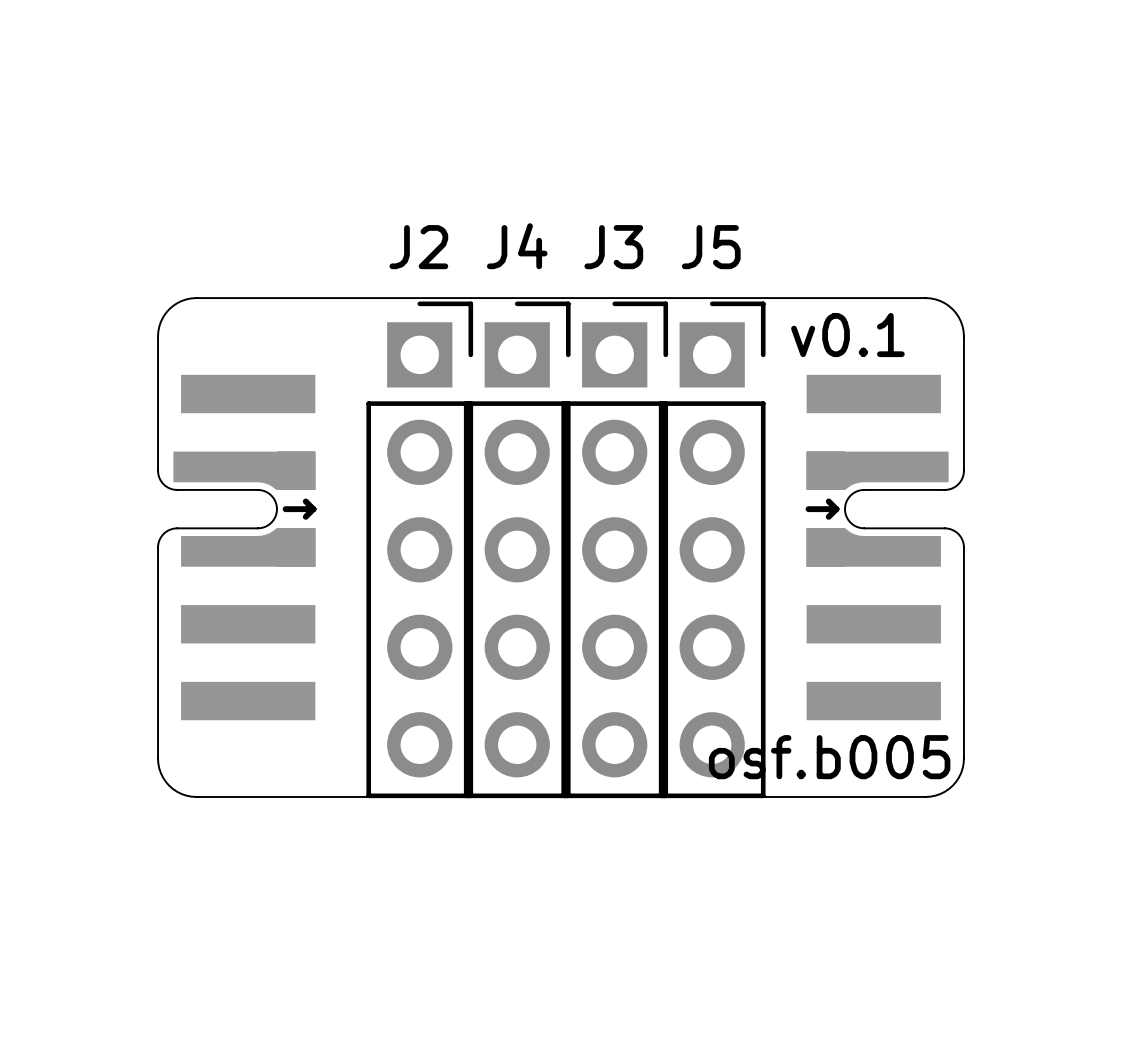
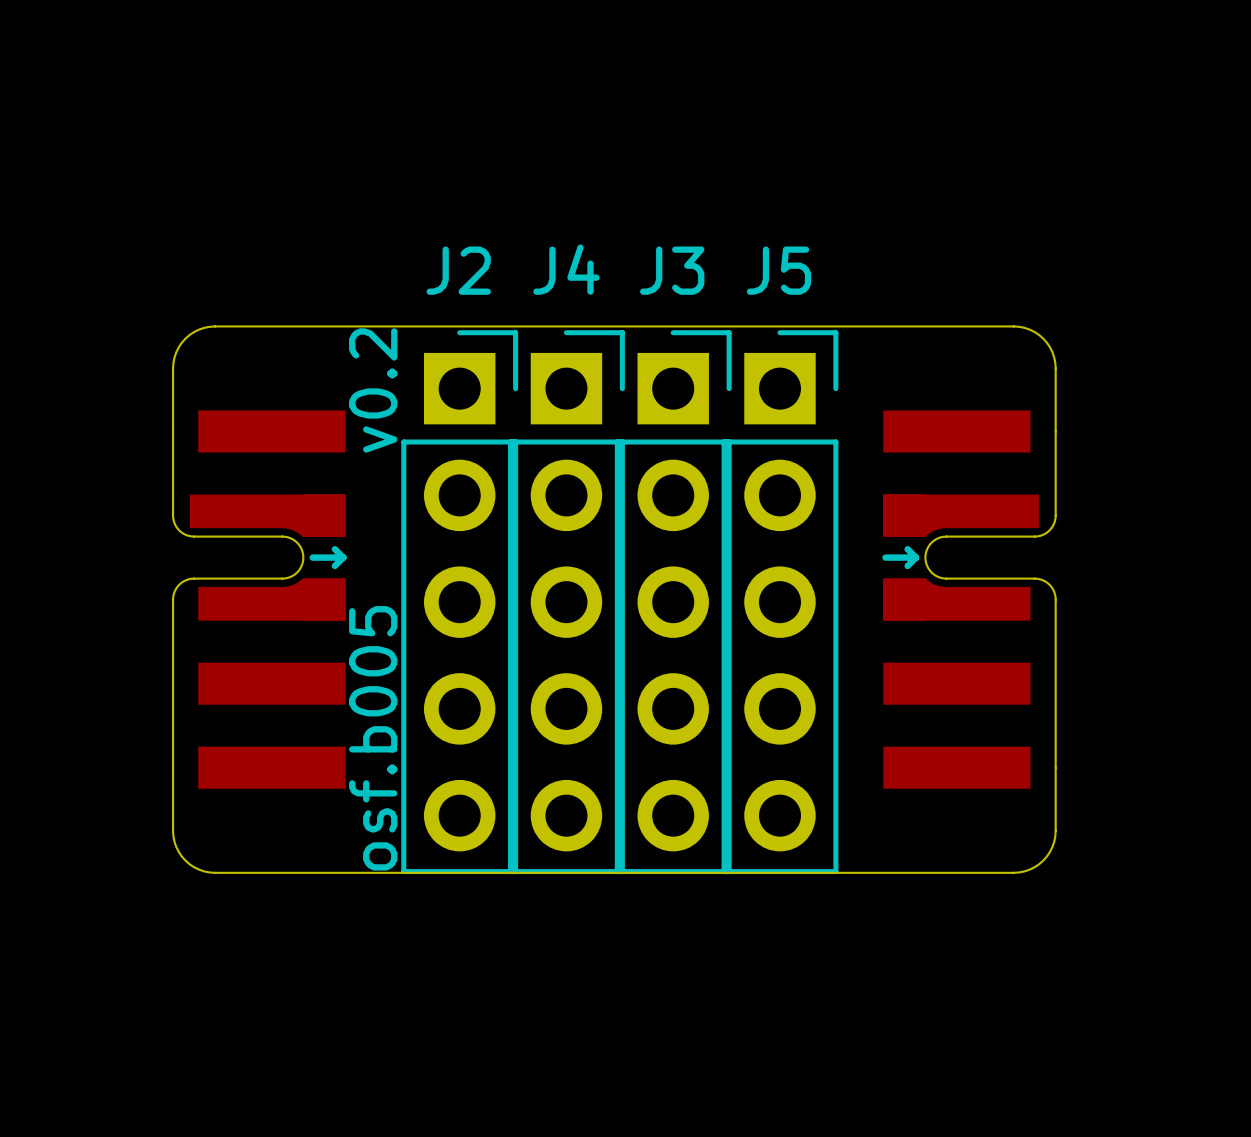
text: v0.1 (847, 335) -> none
text: none -> v0.2 (373, 390)
text rotation: 0° (829, 757) -> 90° counterclockwise (373, 738)
text position: osf.b005 (829, 757) -> osf.b005 (373, 738)

